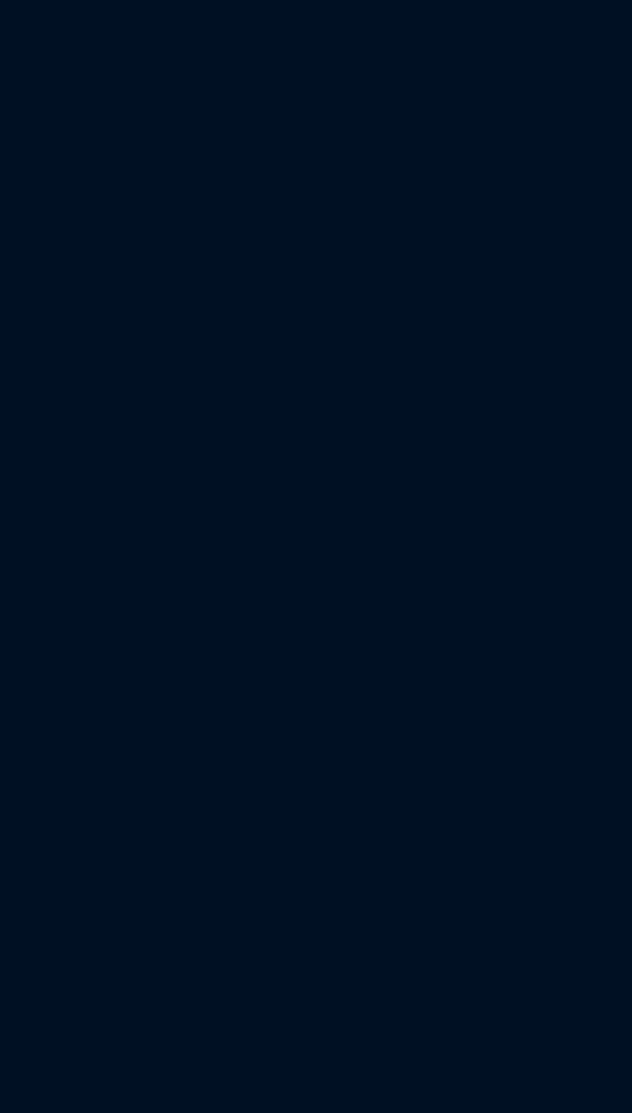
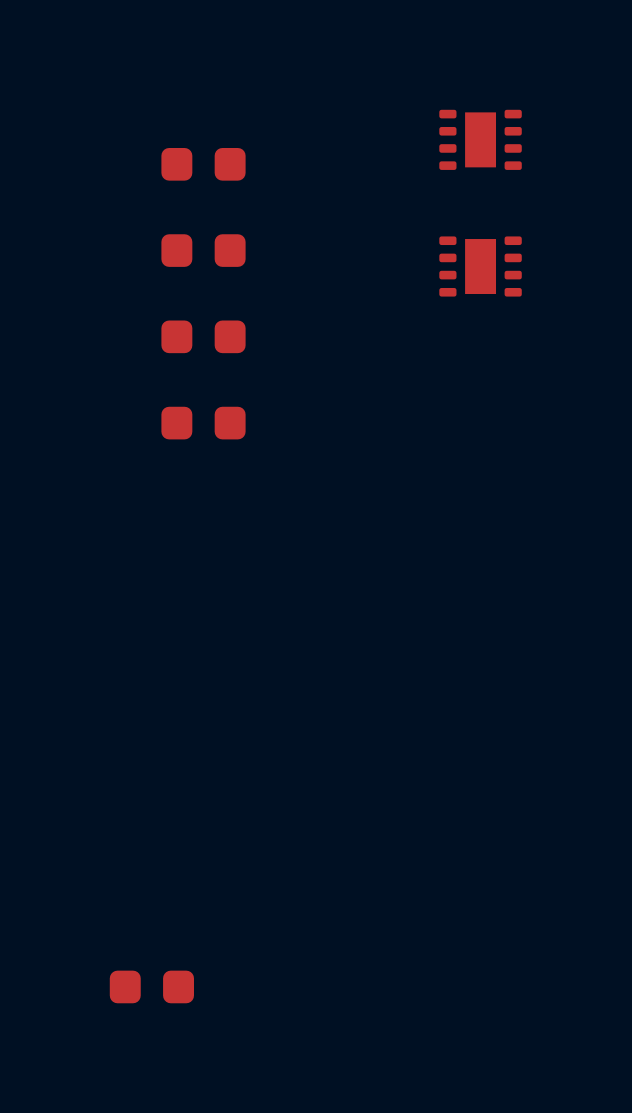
part: none -> (480, 139)
part: none -> (203, 164)
part: none -> (203, 250)
part: none -> (480, 266)
part: none -> (203, 336)
part: none -> (203, 423)
part: none -> (151, 986)

